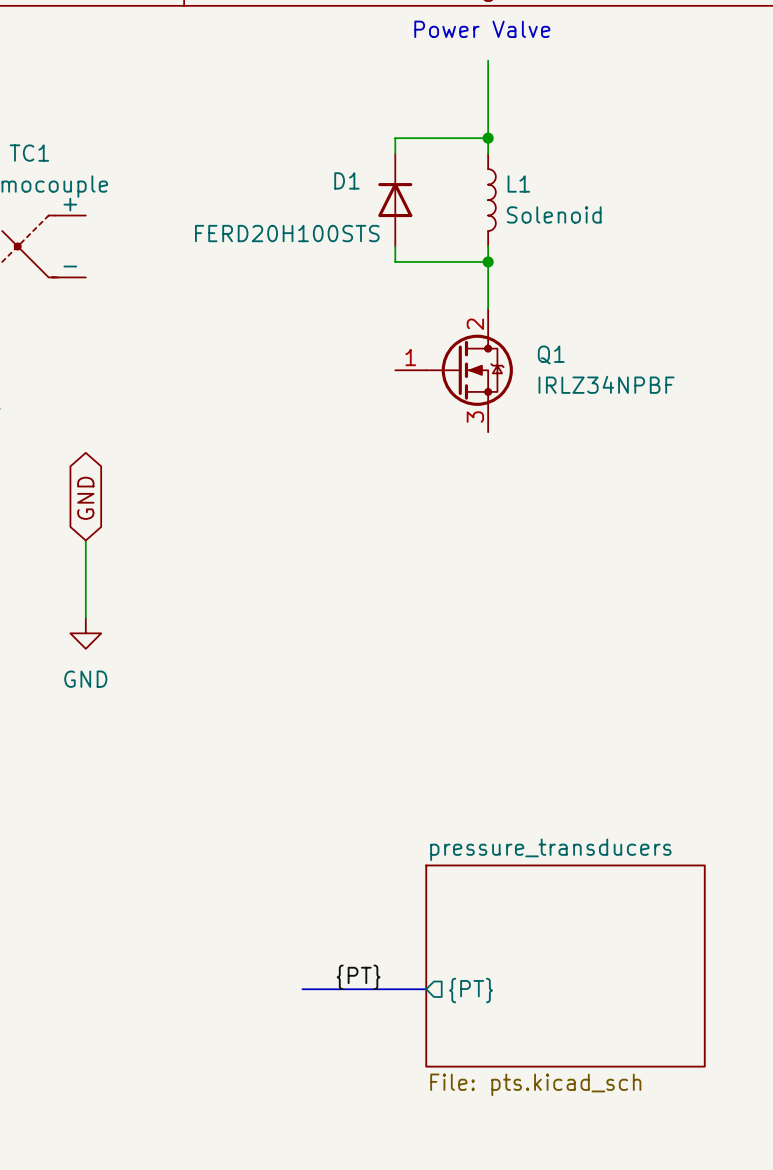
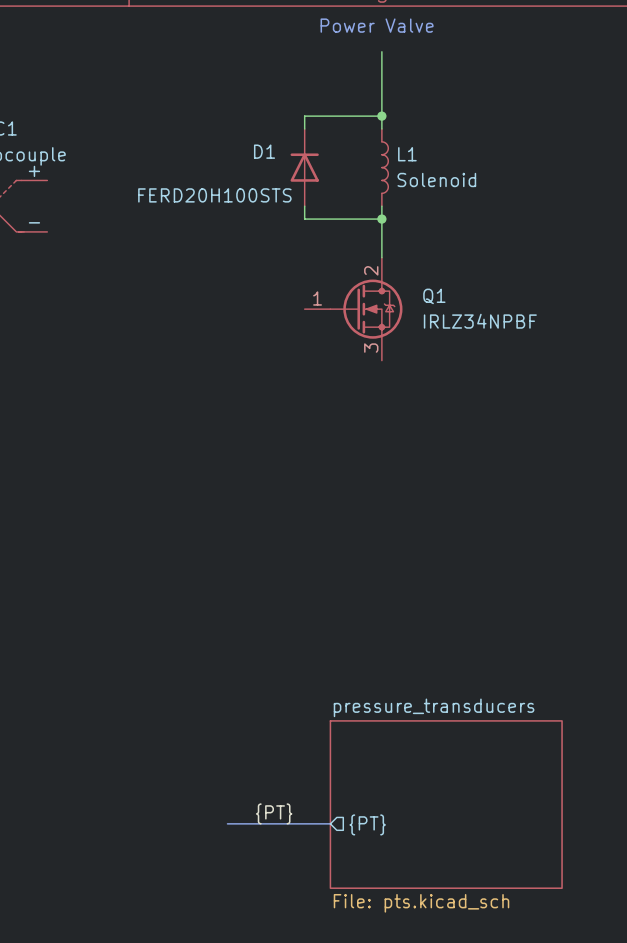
global label: GND (85, 498) -> none
wire: (85, 540) (85, 617) -> none
power symbol: GND (85, 633) -> none

